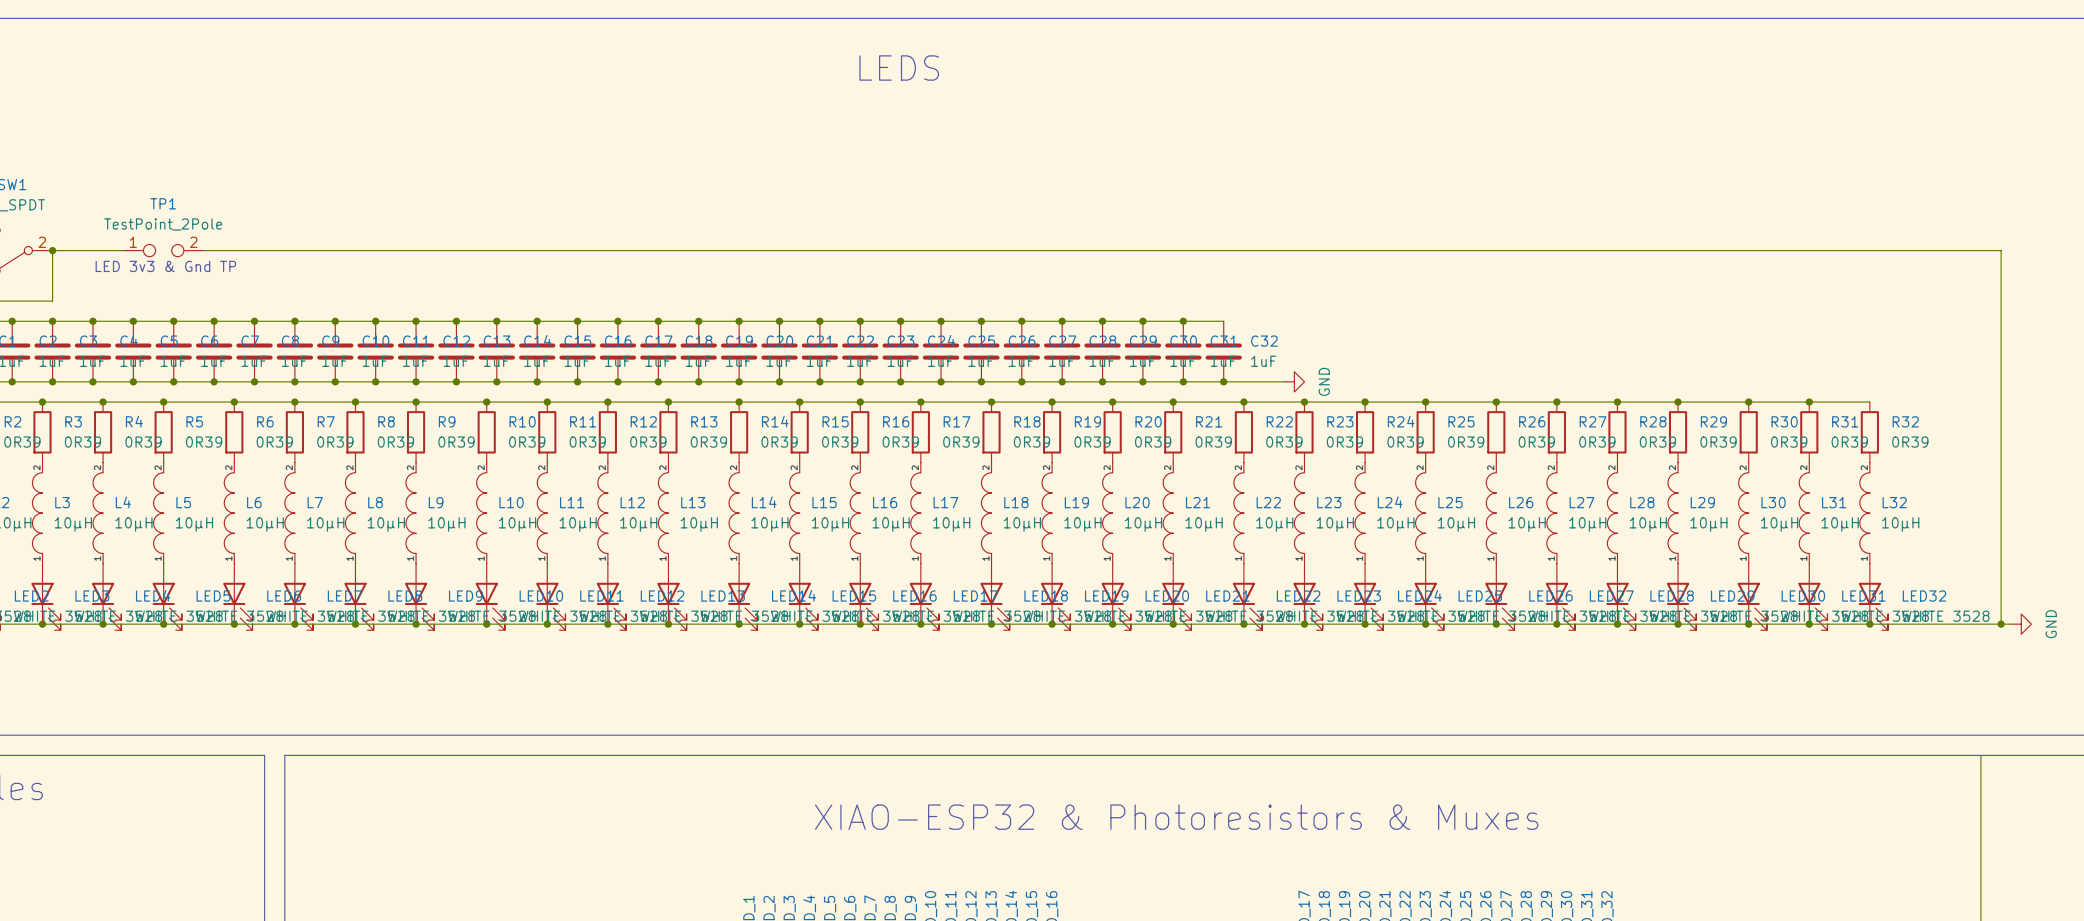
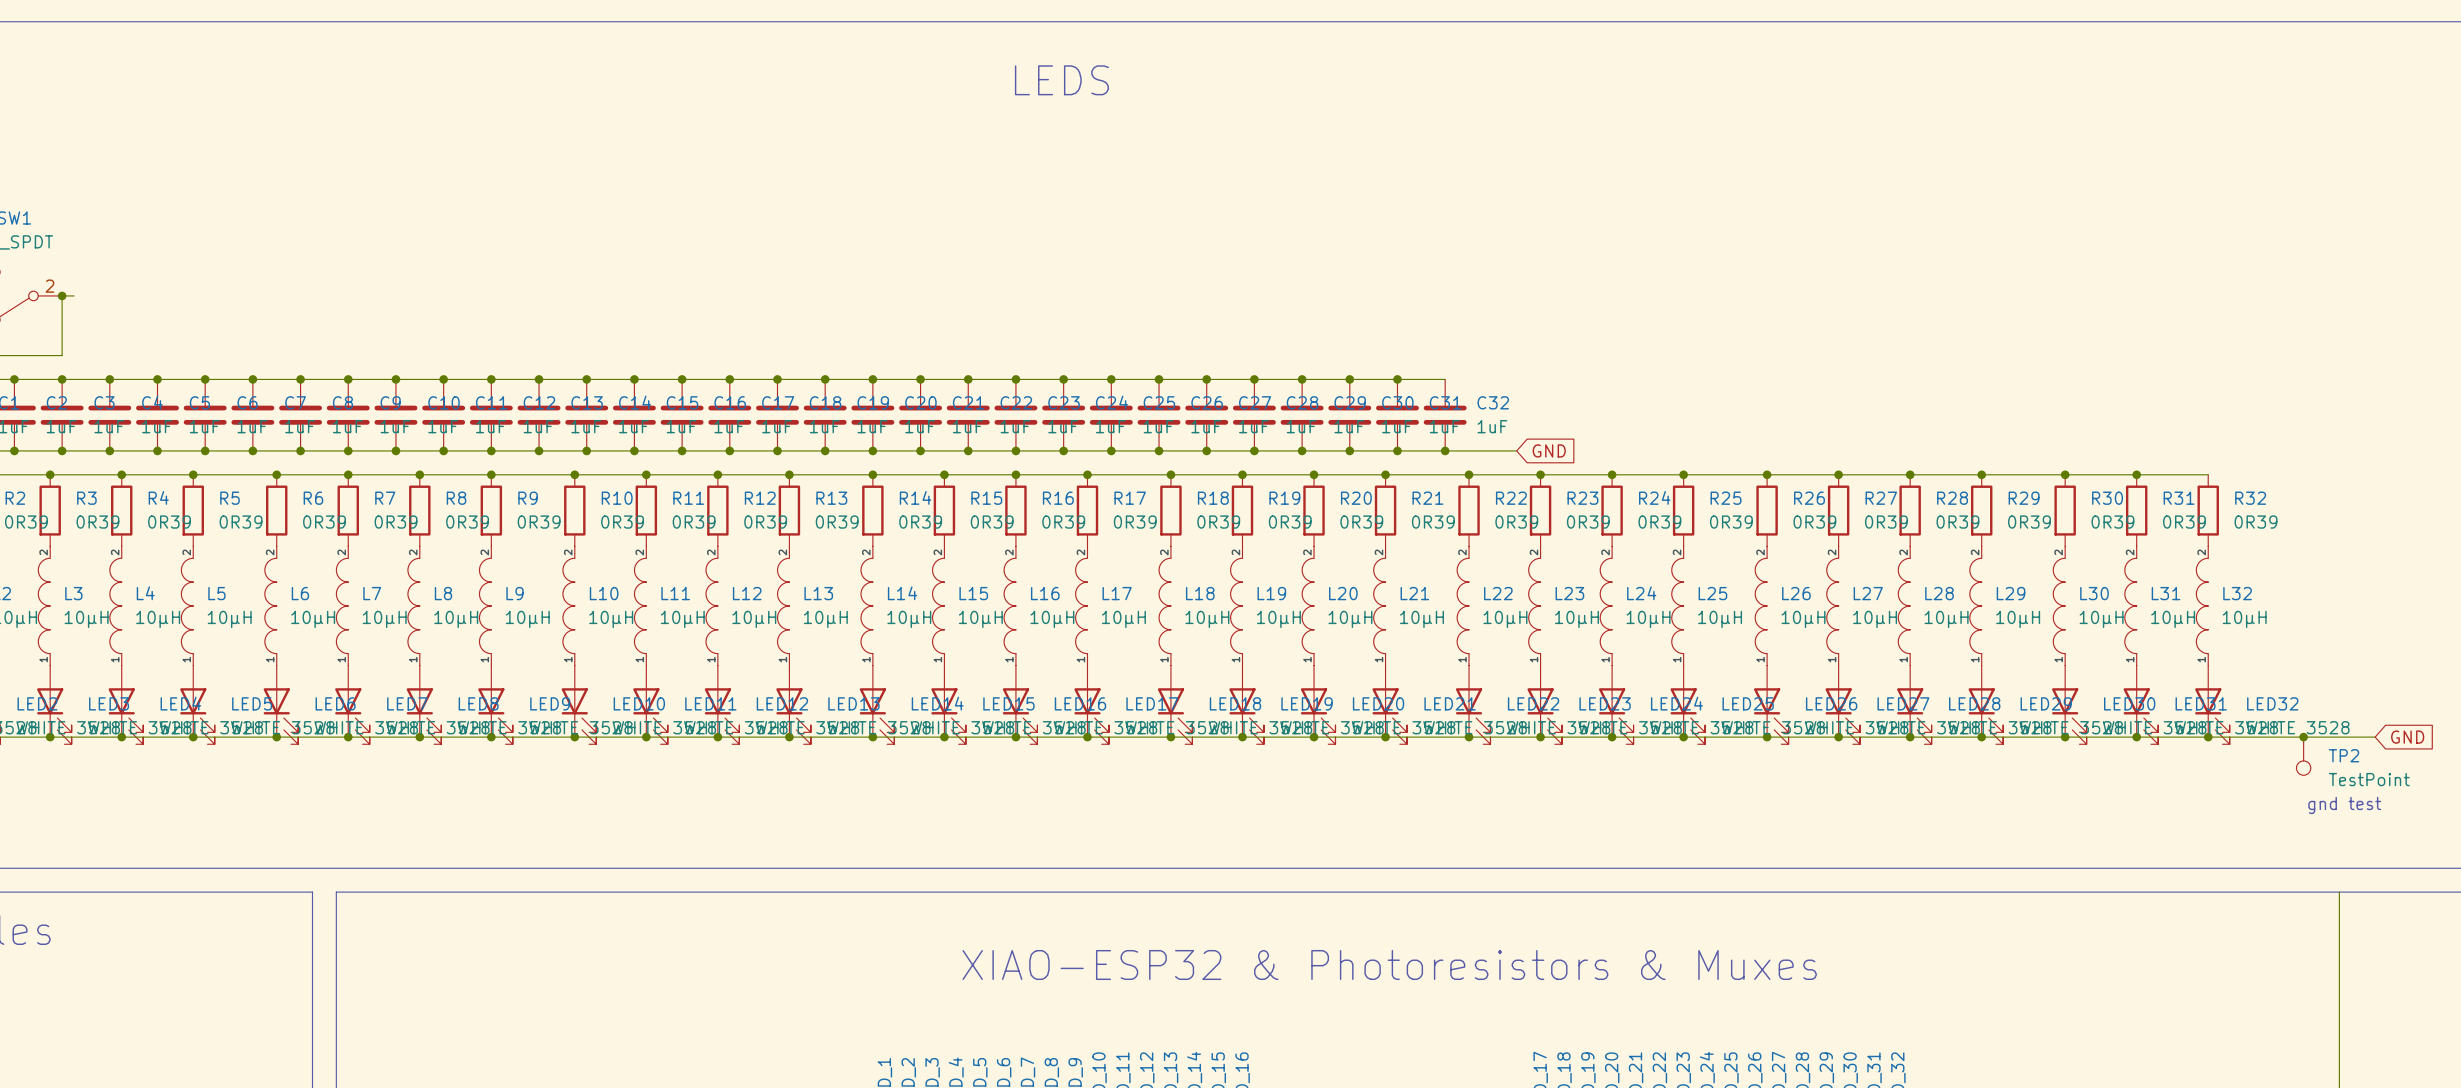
wire: (62, 250) (123, 250) -> none
TP1: TestPoint_2Pole (163, 250) -> none
wire: (204, 250) (2001, 250) (2001, 624) -> none
text: LED 3v3 & Gnd TP (165, 266) -> none
power symbol: GND (1294, 381) -> none
global label: none -> GND (1549, 450)
junction: none -> (2303, 737)
junction: (2001, 624) -> none
power symbol: GND (2021, 624) -> none
global label: none -> GND (2407, 737)
TP2: none -> TestPoint (2303, 756)
text: none -> gnd test (2344, 805)

